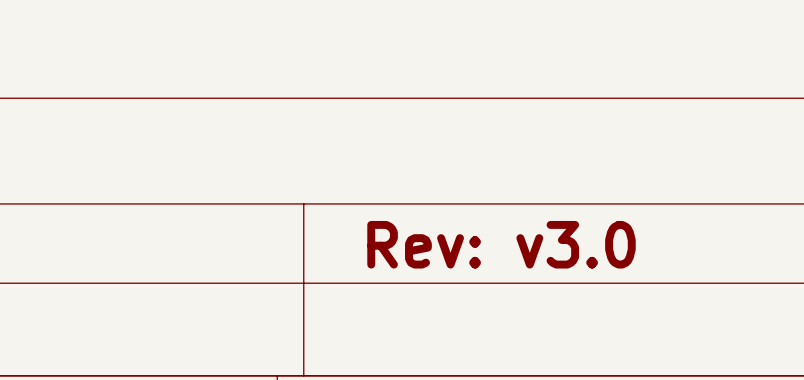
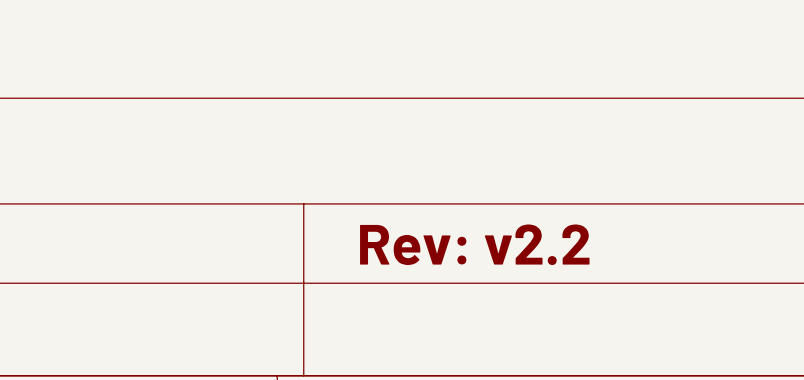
title block: Rev: v3.0 (501, 244) -> Rev: v2.2 (474, 244)

